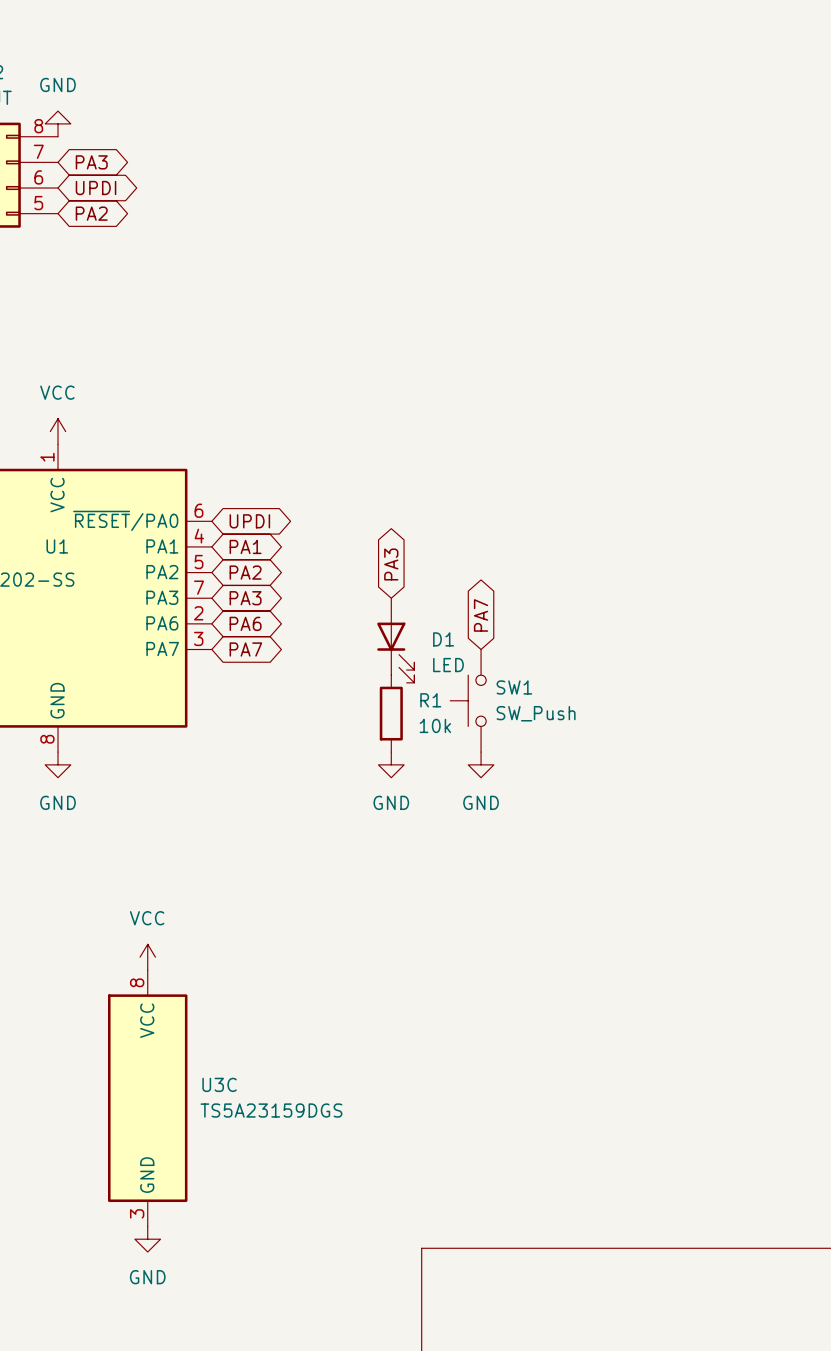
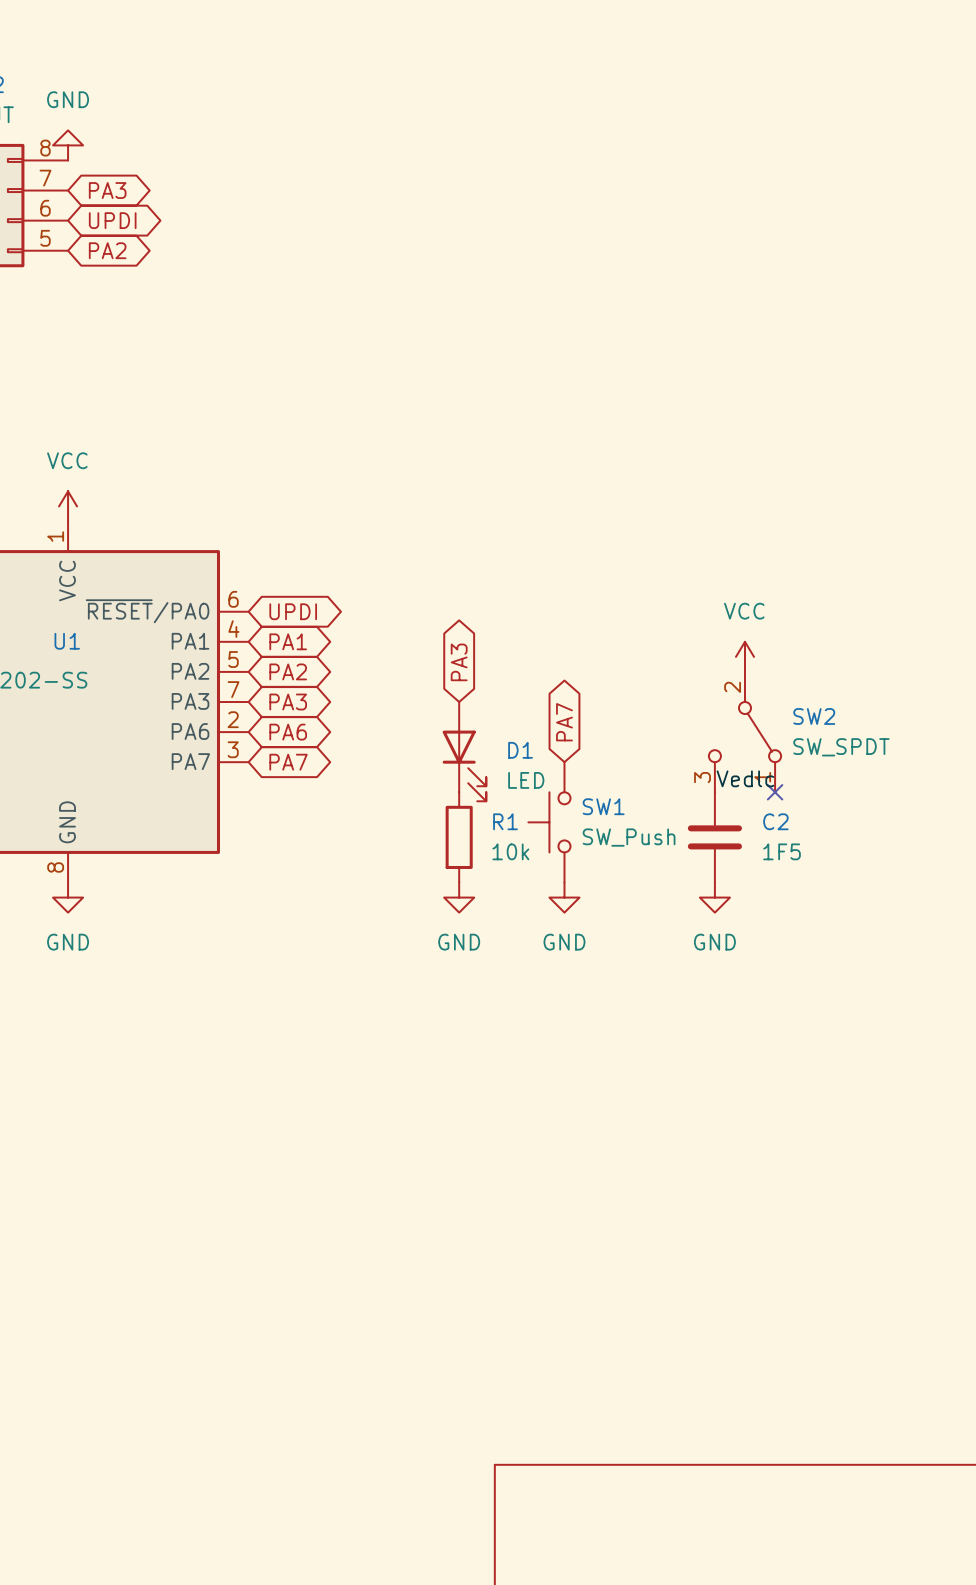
power symbol: none -> VCC (745, 656)
SW2: none -> SW_SPDT (745, 732)
label: none -> Vedlc (745, 778)
no-connect mark: none -> (775, 792)
C2: none -> 1F5 (714, 837)
power symbol: none -> GND (714, 897)
power symbol: VCC (147, 957) -> none
U3C: TS5A23159DGS (147, 1098) -> none
power symbol: GND (147, 1239) -> none

